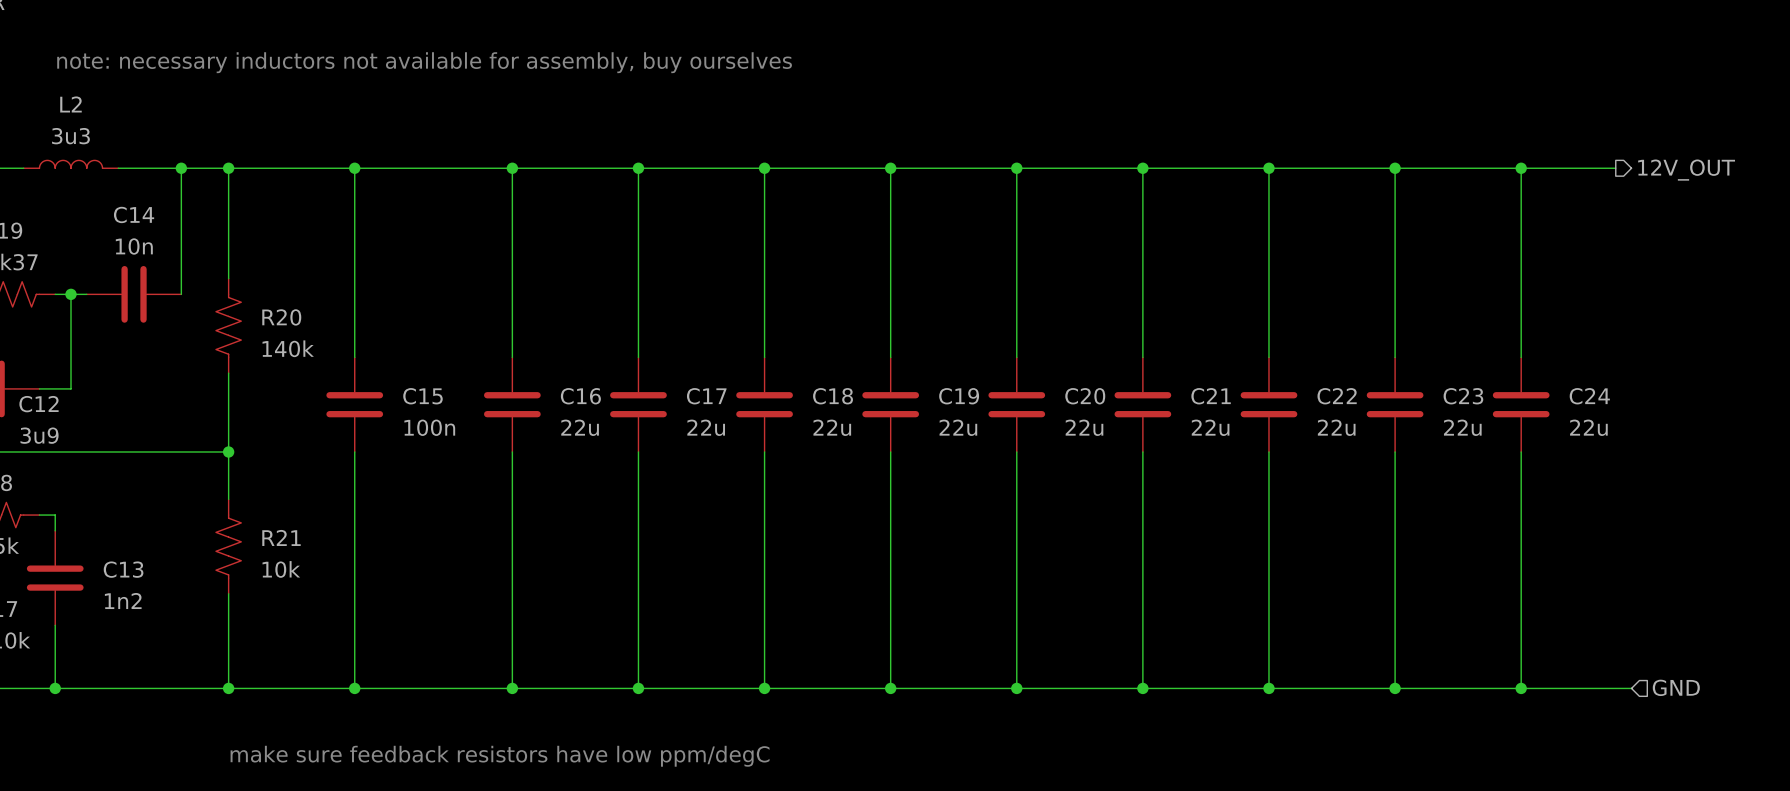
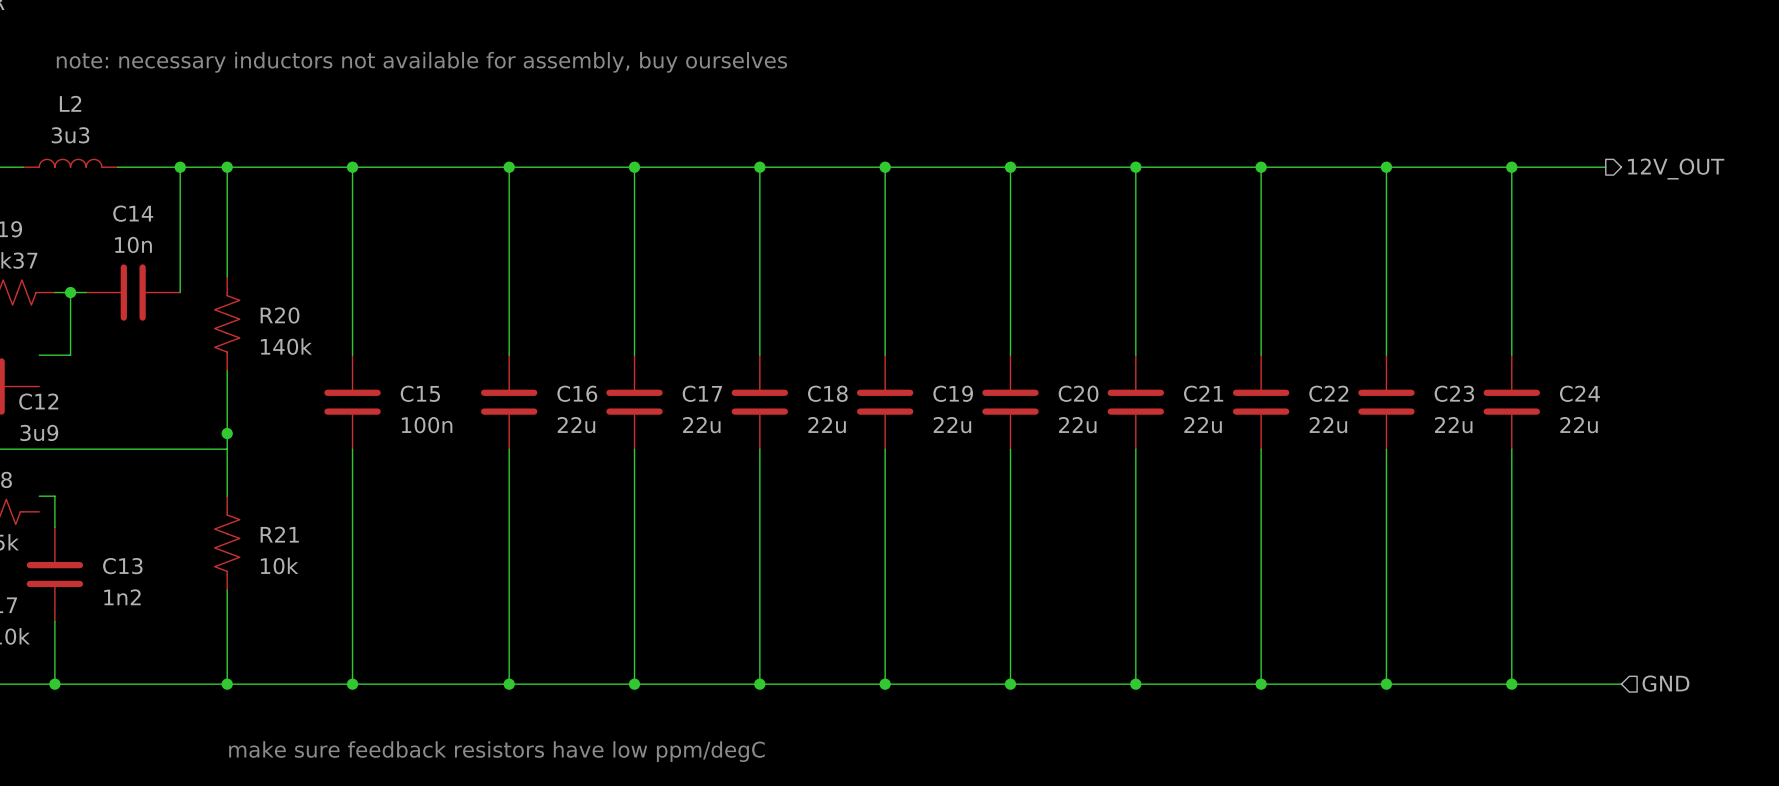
wire: (71, 357) (71, 388) (39, 388) -> (70, 355) (39, 355)
junction position: (228, 451) -> (227, 433)
wire: (39, 515) (55, 515) -> (39, 496) (54, 496) (54, 511)

